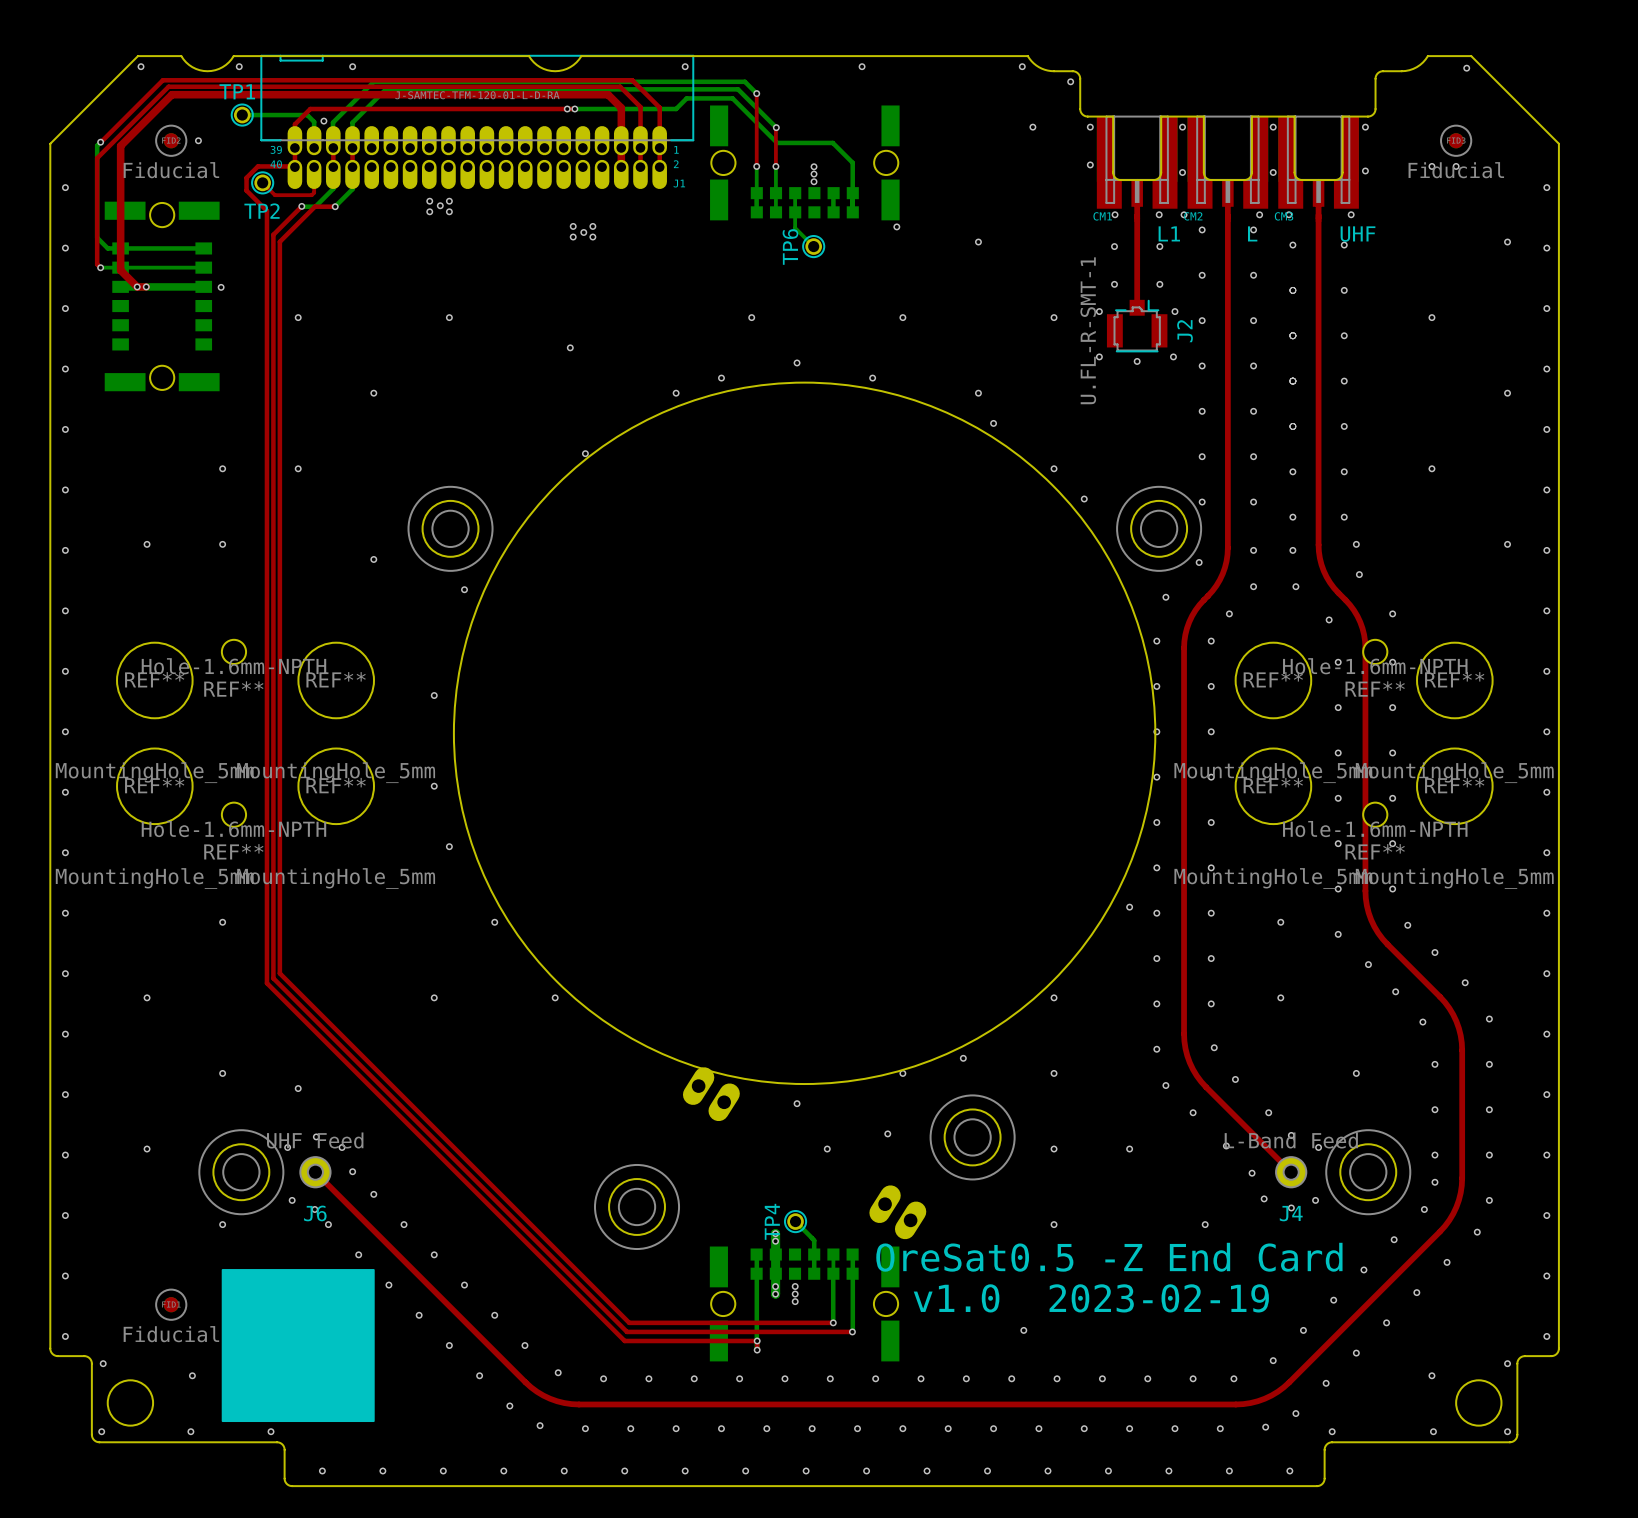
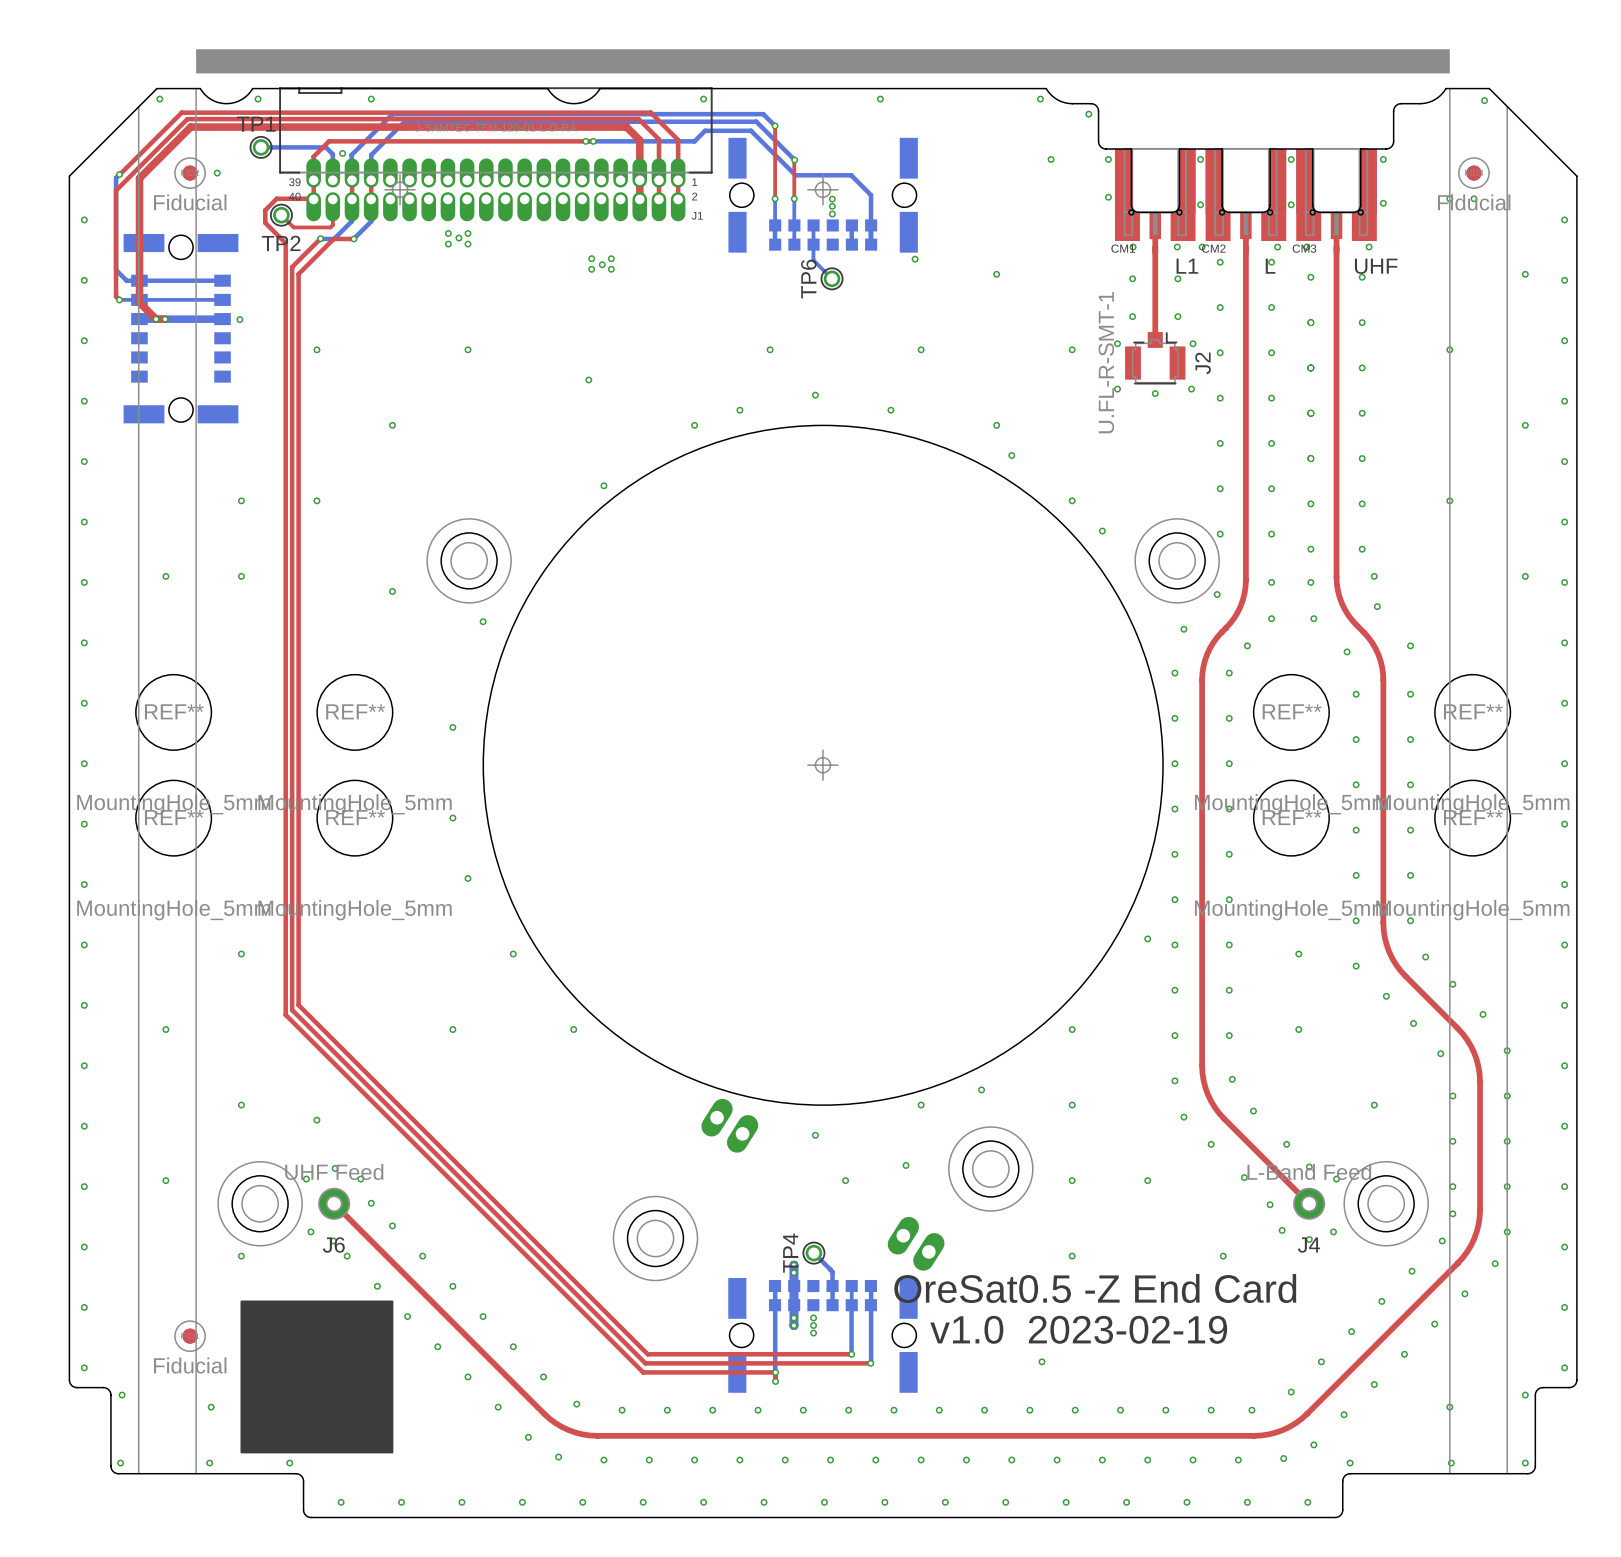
drawing: none -> [138, 49, 1508, 1474]
board edge: none -> (157, 88) (69, 176) (69, 1380) (70, 1384) (75, 1387) (104, 1387) (110, 1392) (110, 1466) (113, 1471) (118, 1473) (297, 1473) (303, 1480) (303, 1511) (306, 1515) (311, 1517) (1335, 1517) (1339, 1515) (1342, 1511) (1342, 1480) (1348, 1473) (1527, 1473) (1533, 1471) (1535, 1466) (1535, 1392) (1541, 1387) (1571, 1387) (1575, 1384) (1576, 1380) (1576, 176) (1489, 88) (1445, 88) (1437, 97) (1429, 102) (1400, 103) (1395, 105) (1393, 110) (1391, 146) (1386, 148) (1360, 148) (1360, 205) (1358, 210) (1353, 212) (1319, 212) (1313, 208) (1312, 148) (1270, 148) (1270, 205) (1267, 210) (1262, 212) (1228, 212) (1223, 208) (1222, 148) (1179, 148) (1177, 209) (1171, 212) (1136, 211) (1131, 205) (1131, 148) (1101, 147) (1098, 142) (1098, 111) (1096, 105) (1091, 103) (1063, 102) (1054, 97) (1046, 88) (600, 88) (589, 99) (573, 103) (558, 99) (547, 88) (252, 88) (241, 99) (226, 103) (211, 99) (200, 88) (157, 88)
round board edge: none -> [1128, 209, 1135, 216]
round board edge: none -> [1176, 209, 1183, 216]
round board edge: none -> [1219, 209, 1225, 216]
round board edge: none -> [1267, 209, 1273, 216]
round board edge: none -> [1310, 209, 1316, 216]
round board edge: none -> [1358, 209, 1364, 216]
round board edge size: [453, 382, 1156, 1085] -> [483, 425, 1164, 1106]
REF**: Hole-1.6mm-NPTH (233, 651) -> none
REF**: Hole-1.6mm-NPTH (1375, 651) -> none
part: (804, 771) -> none
REF**: Hole-1.6mm-NPTH (233, 814) -> none
REF**: Hole-1.6mm-NPTH (1375, 814) -> none

